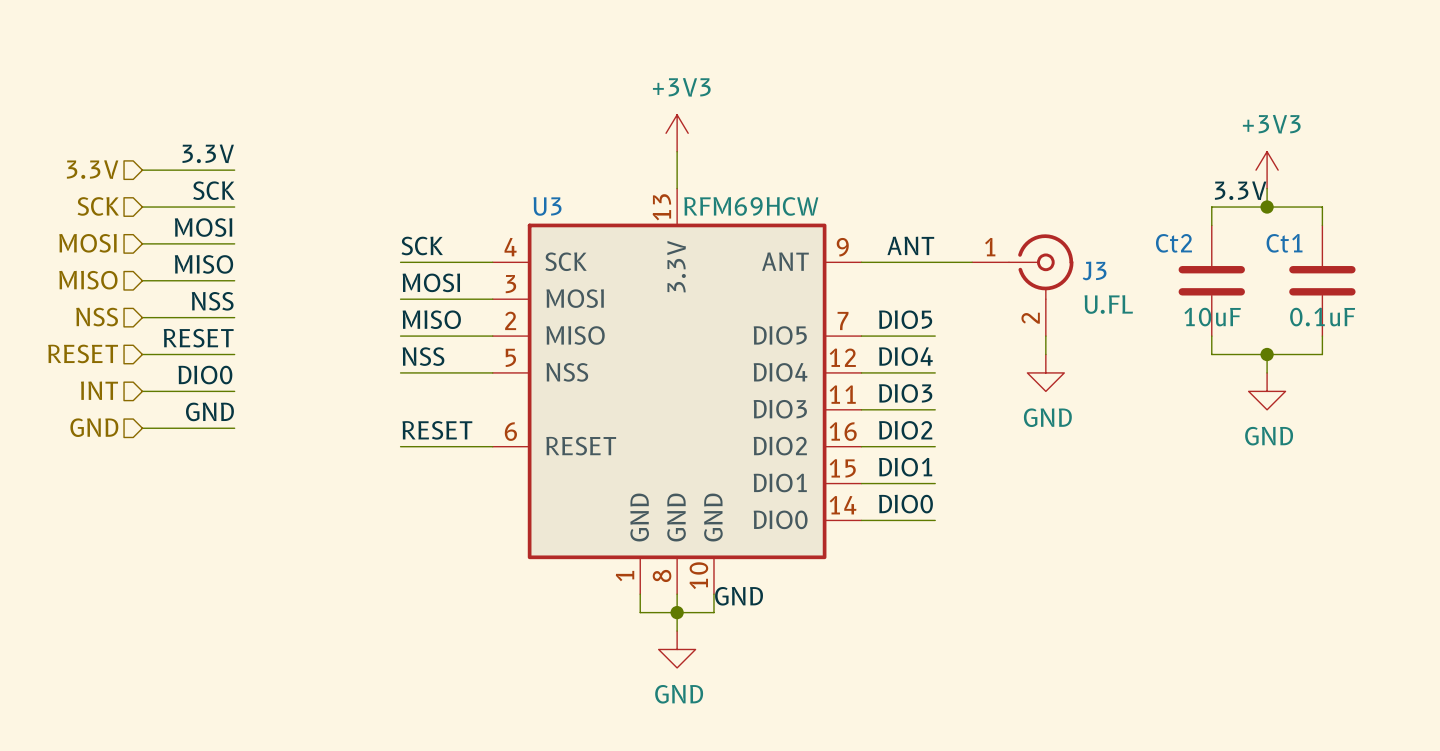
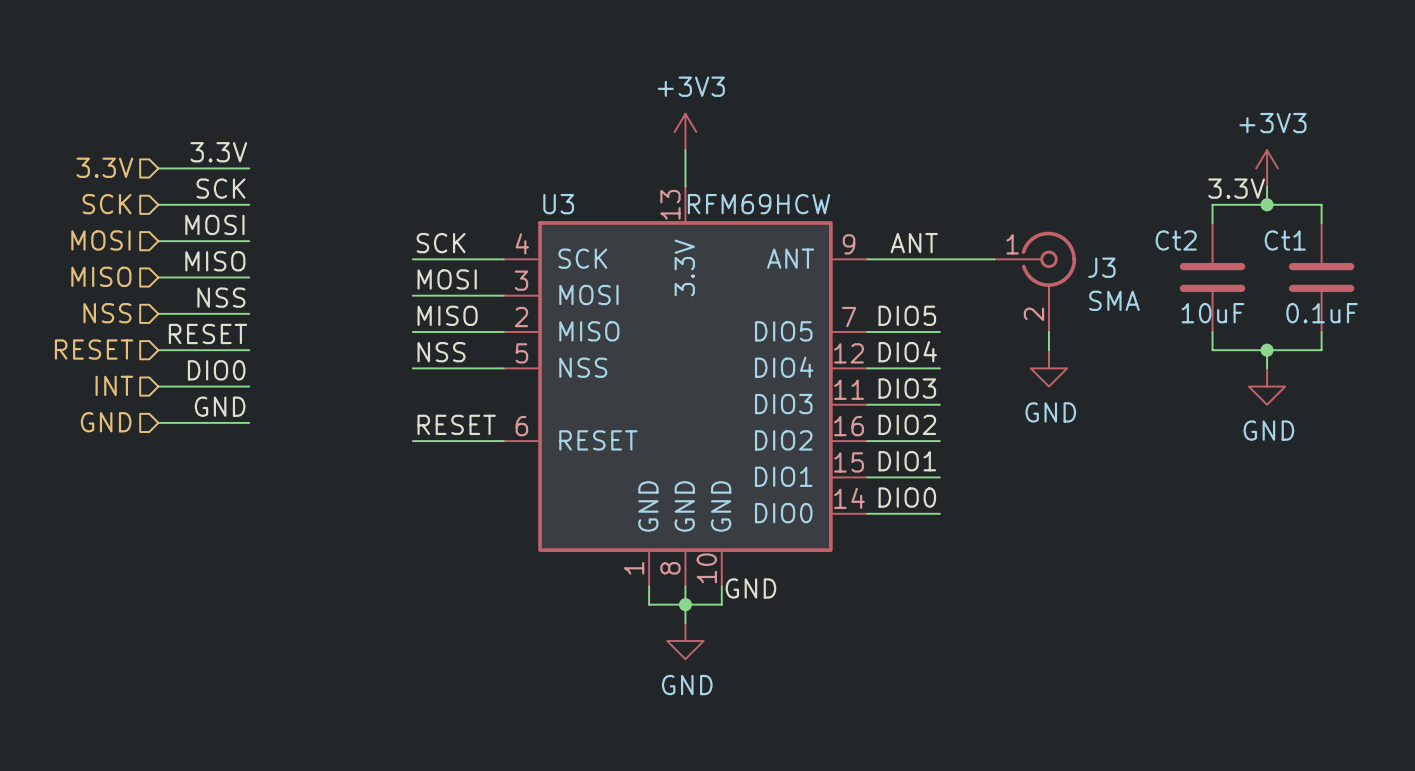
J3 symbol: [972, 234, 1074, 337] -> [994, 231, 1077, 333]
J3 value: U.FL (1108, 304) -> SMA (1114, 300)

